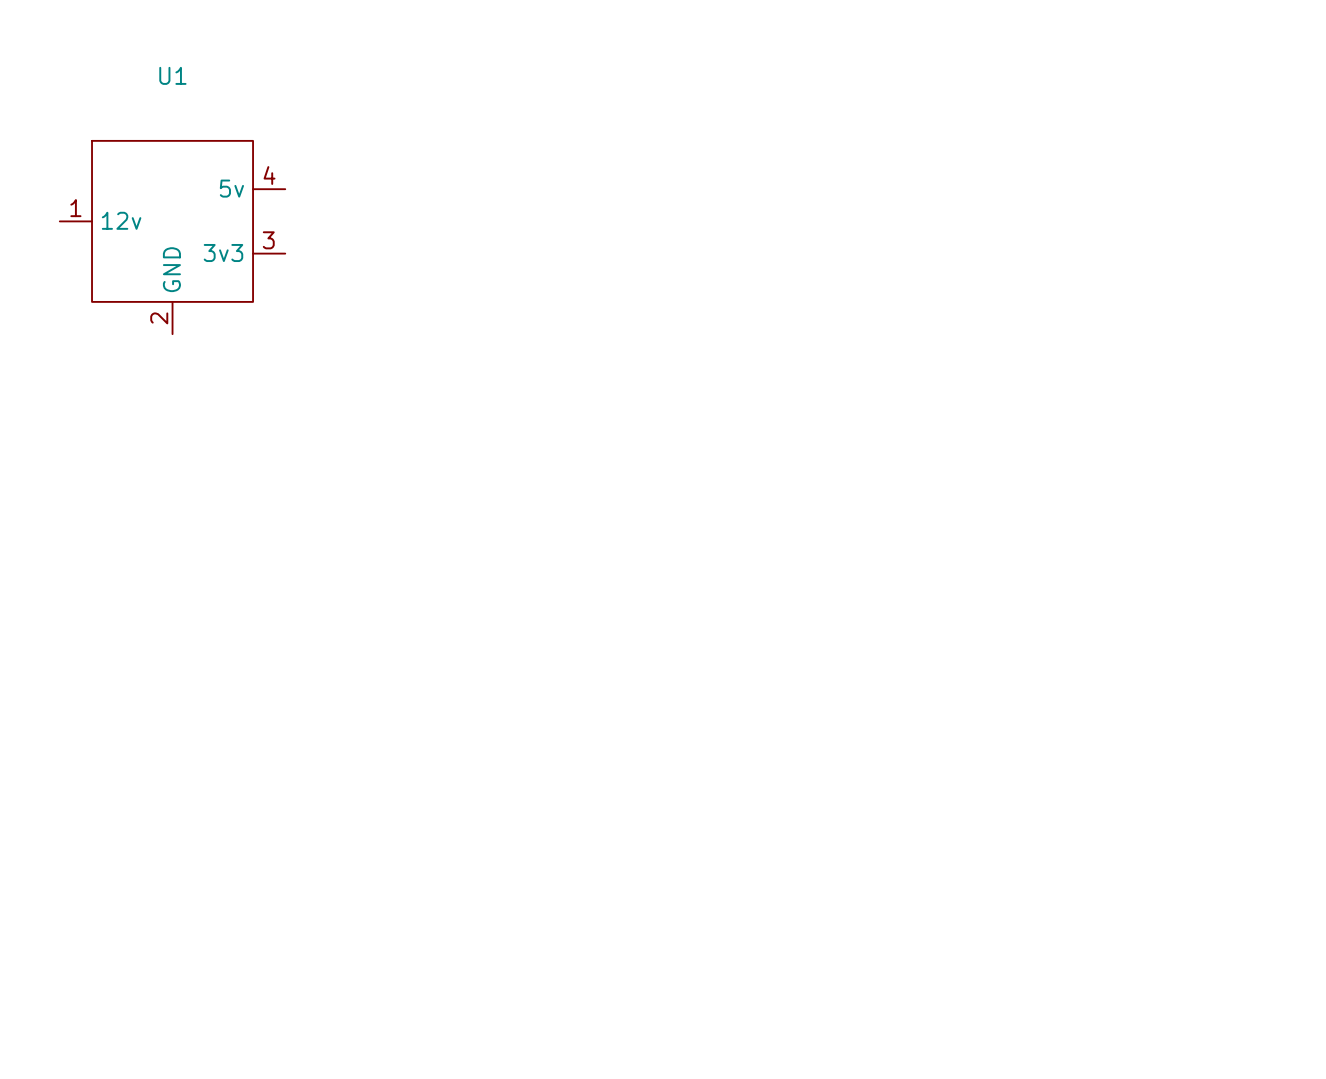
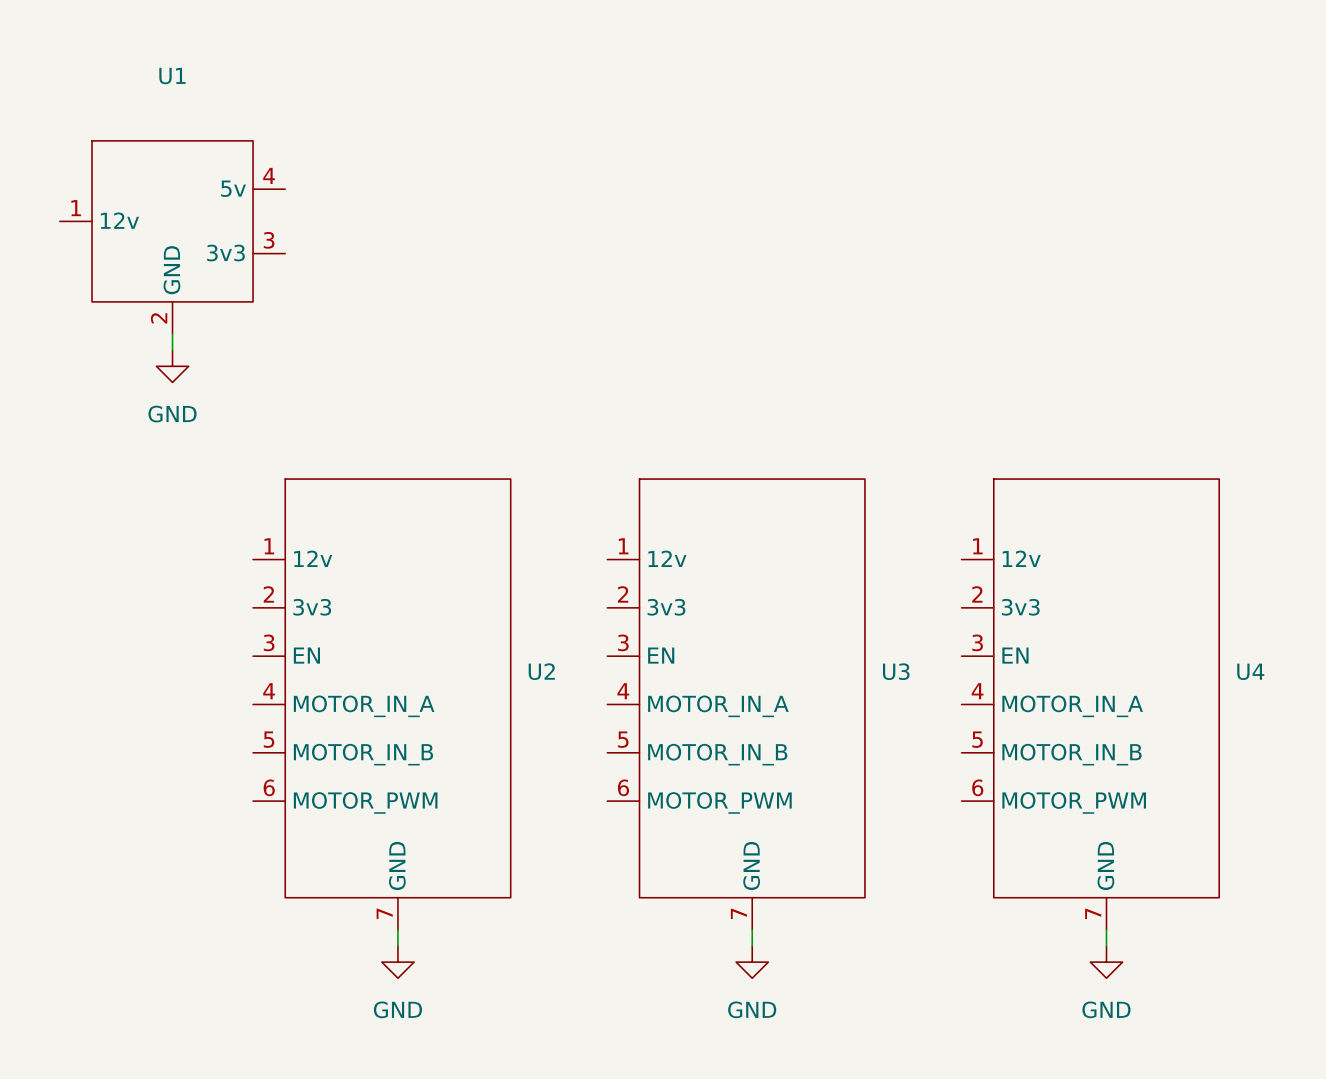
wire: none -> (172, 334) (172, 350)
power symbol: none -> GND (172, 366)
U2: none -> (381, 704)
U3: none -> (736, 704)
U4: none -> (1090, 704)
wire: none -> (397, 929) (397, 946)
wire: none -> (752, 929) (752, 946)
wire: none -> (1106, 929) (1106, 946)
power symbol: none -> GND (397, 962)
power symbol: none -> GND (752, 962)
power symbol: none -> GND (1106, 962)

